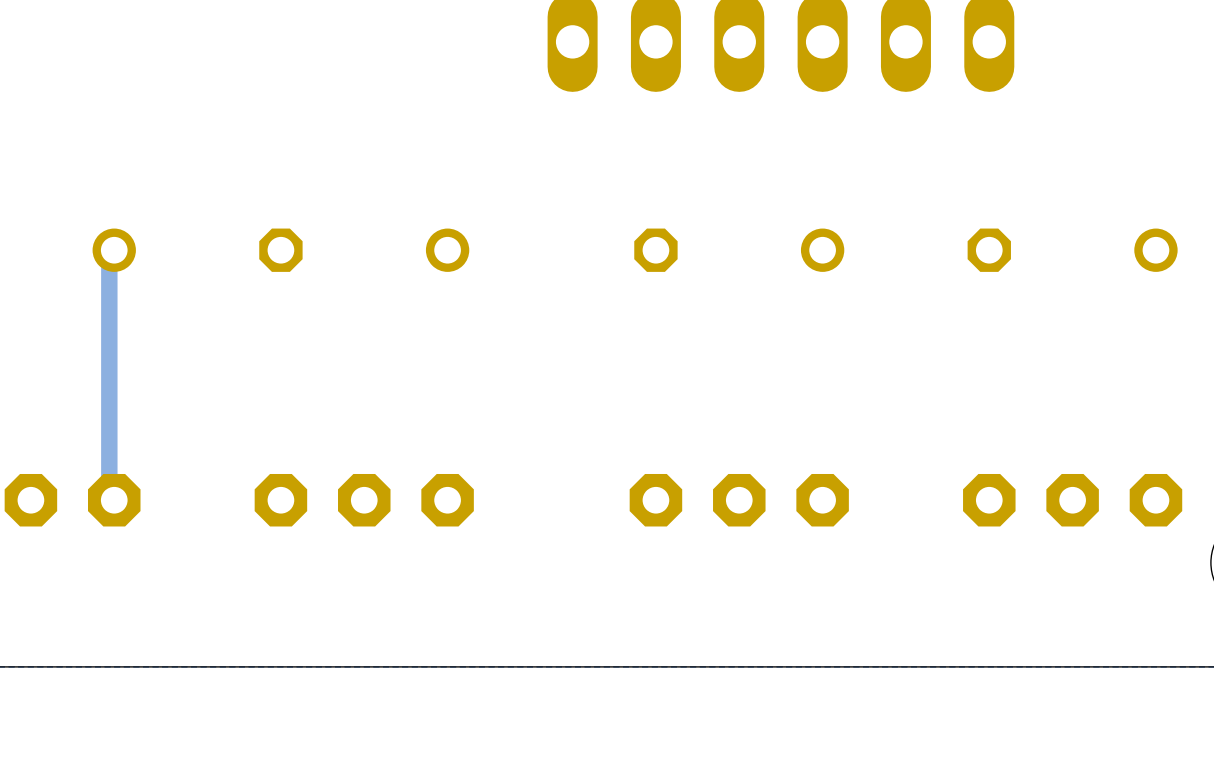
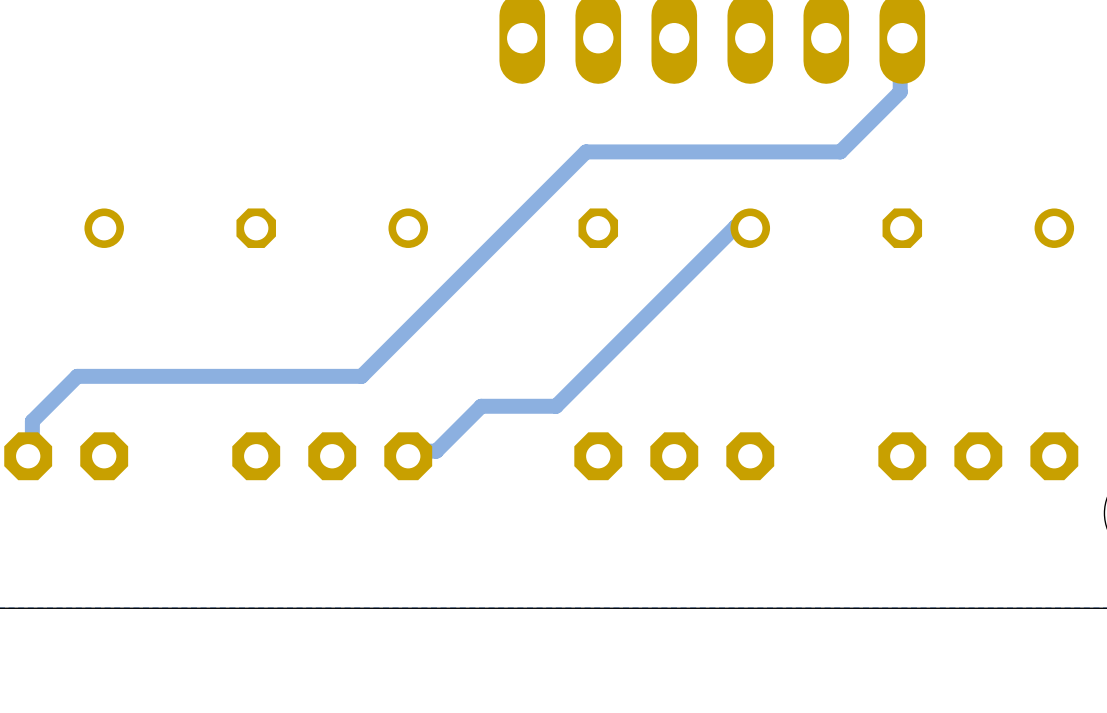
track: none -> (902, 38) (900, 47) (900, 92) (840, 151) (585, 151) (361, 376) (77, 376) (32, 421) (32, 451) (28, 456)
track: (114, 250) (109, 256) (109, 494) (114, 500) -> none
track: none -> (750, 228) (735, 226) (556, 406) (481, 406) (436, 451) (421, 451) (408, 456)

